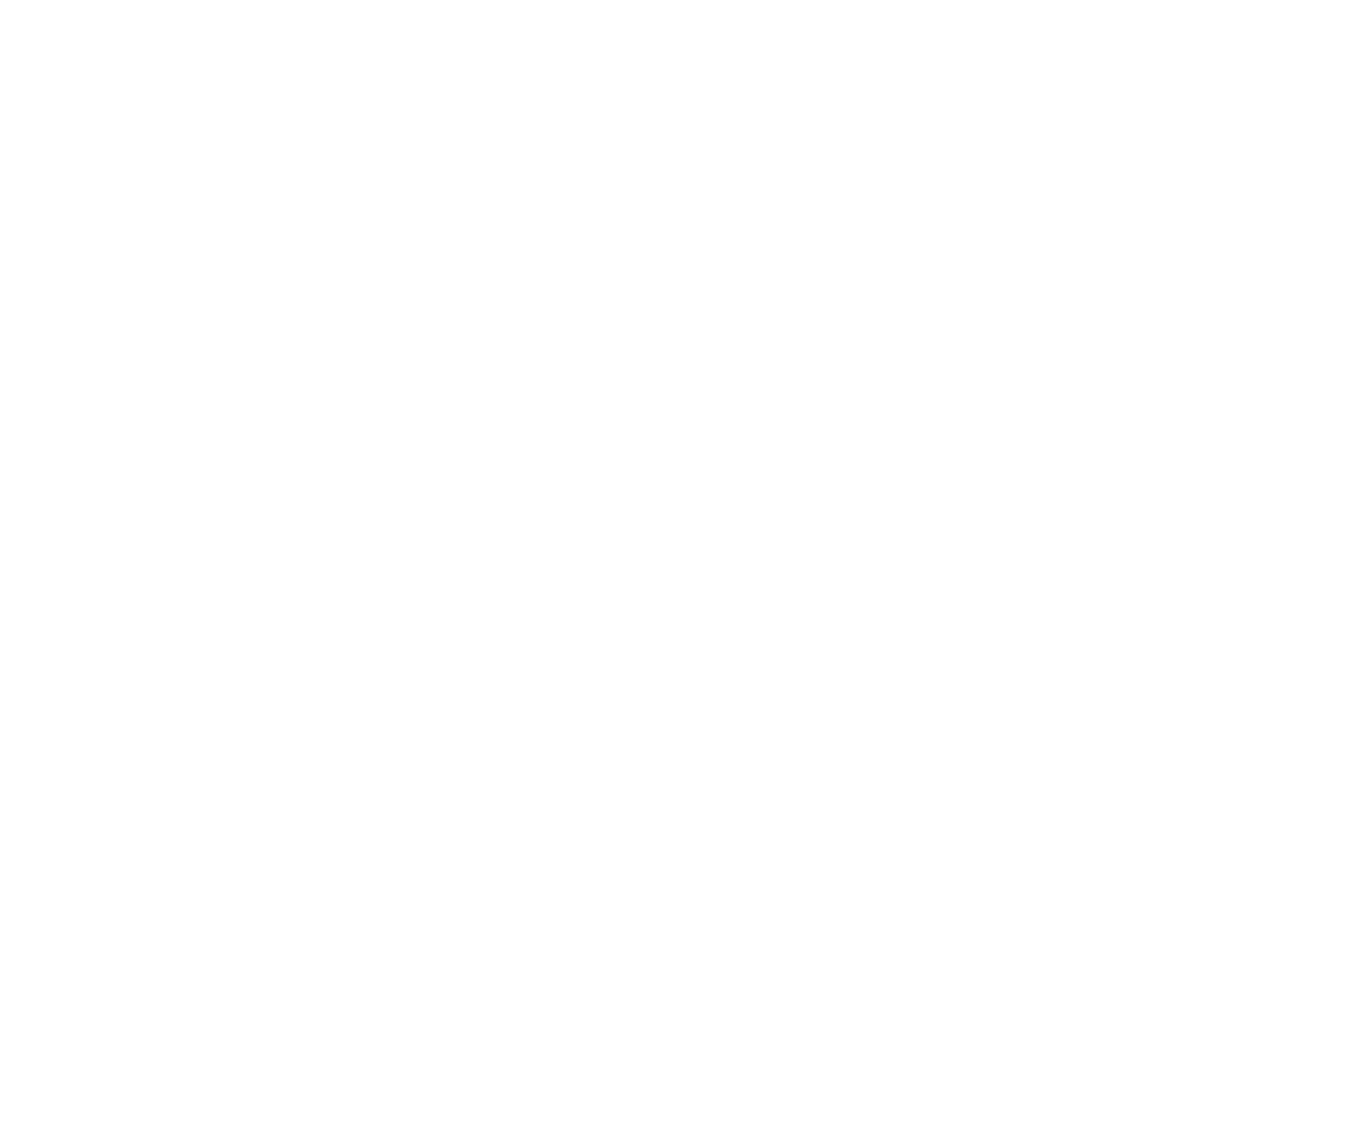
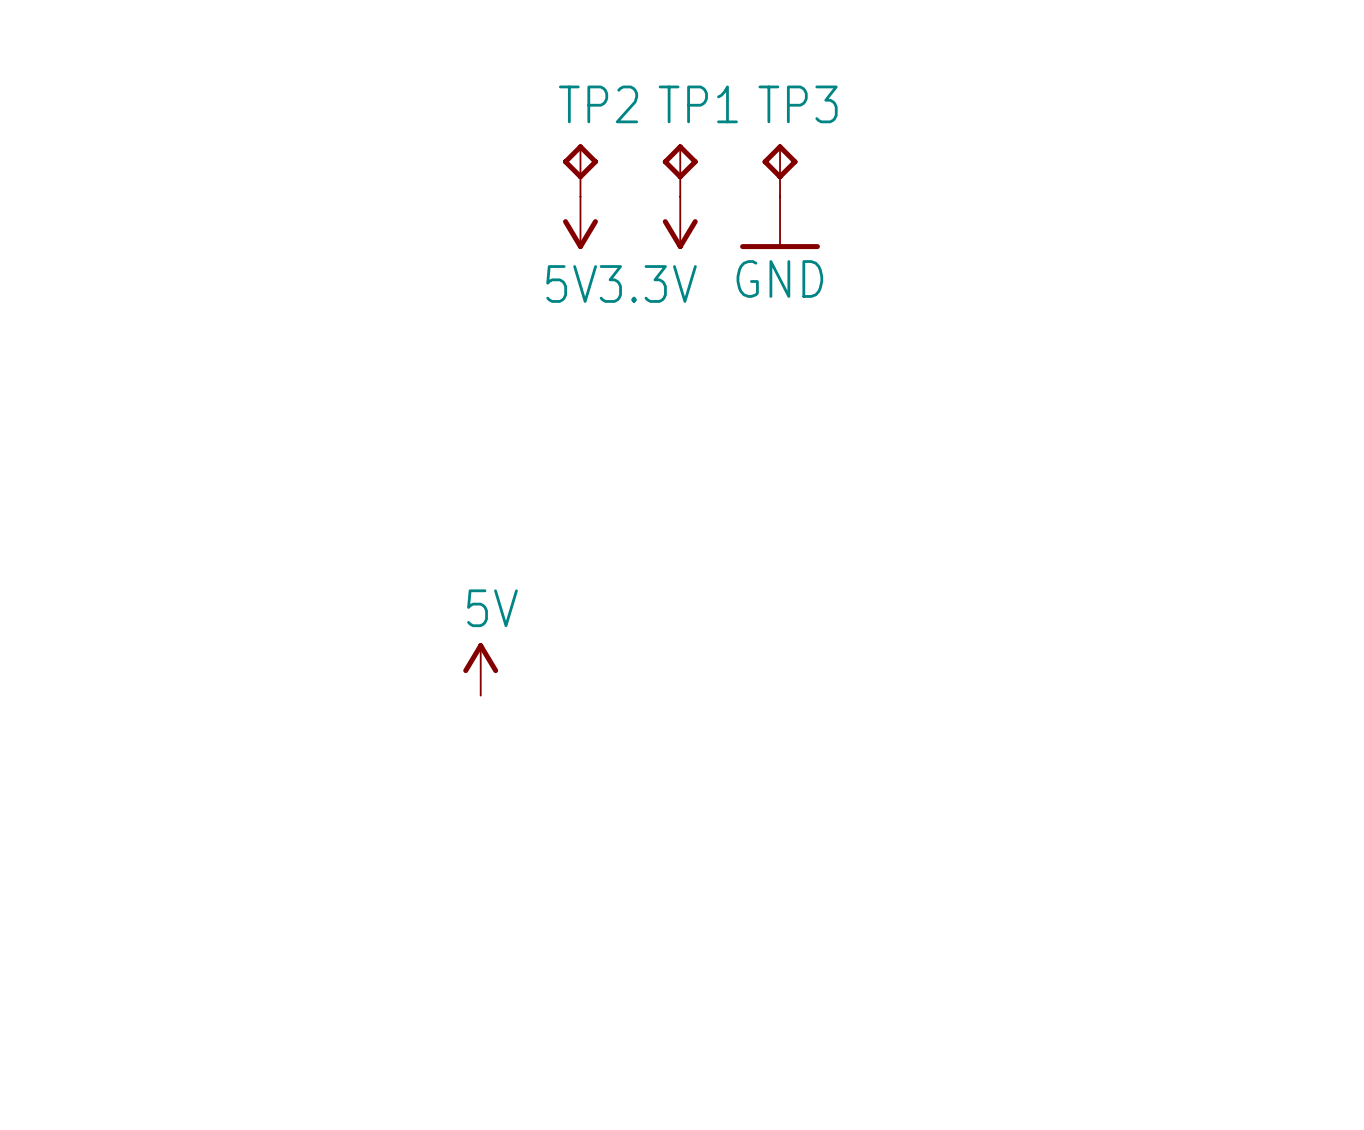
TP2: none -> (580, 170)
TP1: none -> (680, 170)
TP3: none -> (780, 170)
power symbol: none -> 5V (580, 222)
power symbol: none -> 3.3V (680, 222)
power symbol: none -> GND (780, 222)
power symbol: none -> 5V (480, 669)

